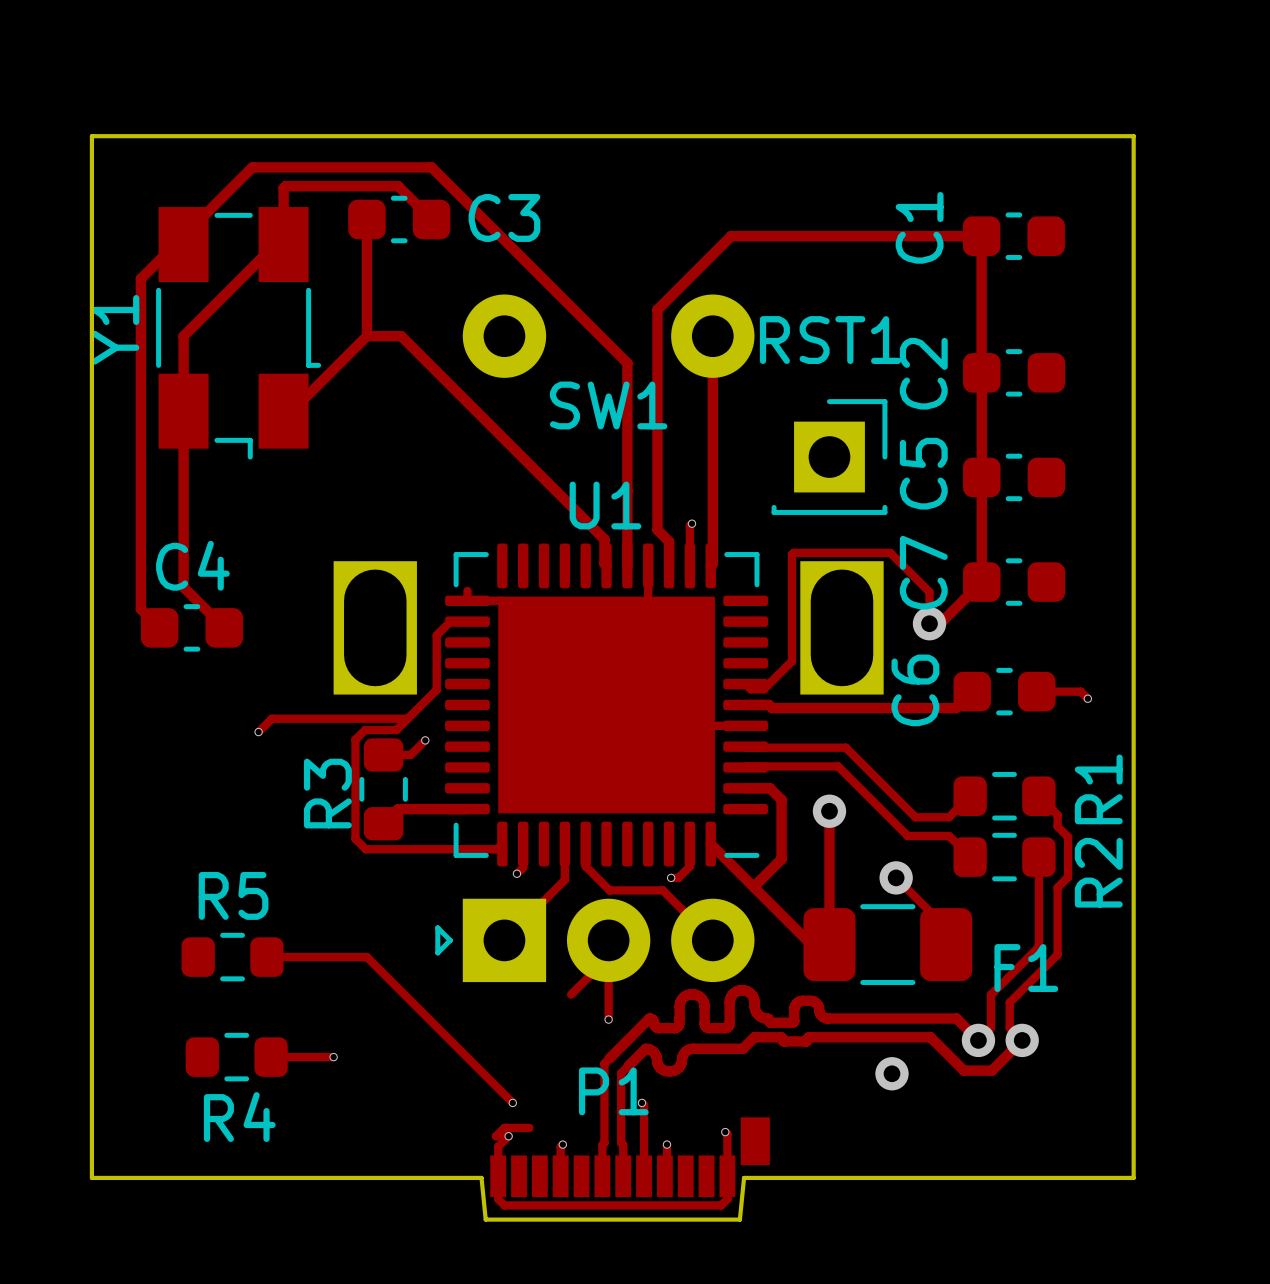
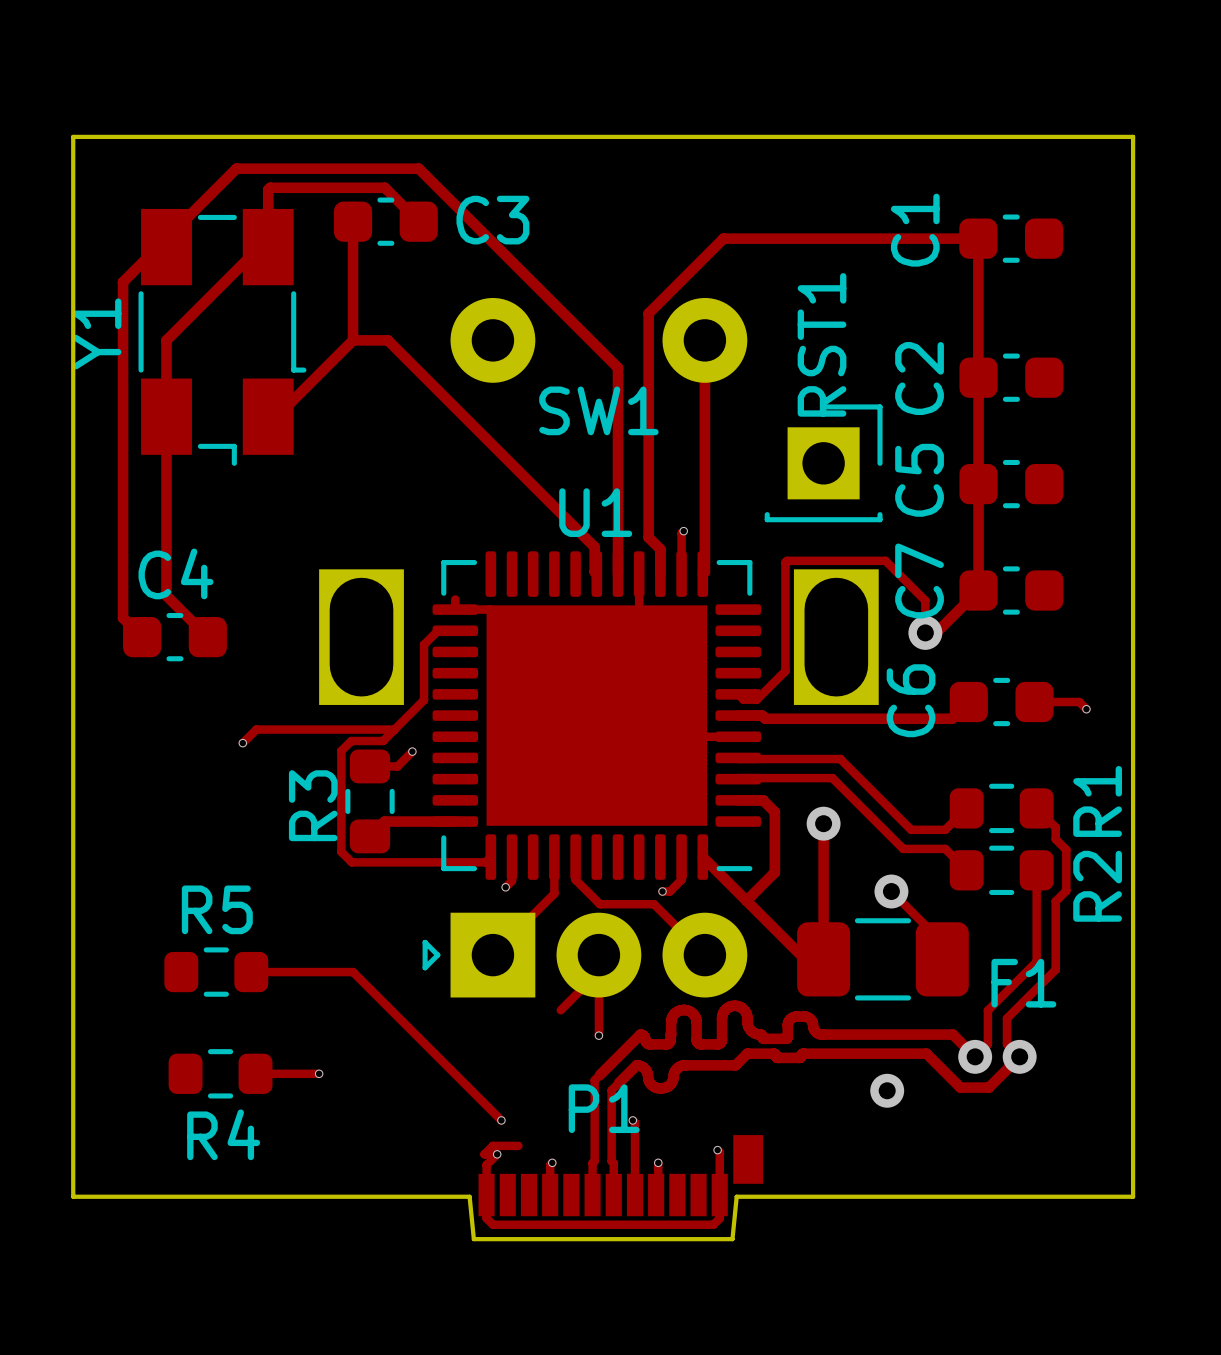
RST1 name rotation: 0° (830, 340) -> 90° counterclockwise (822, 344)

